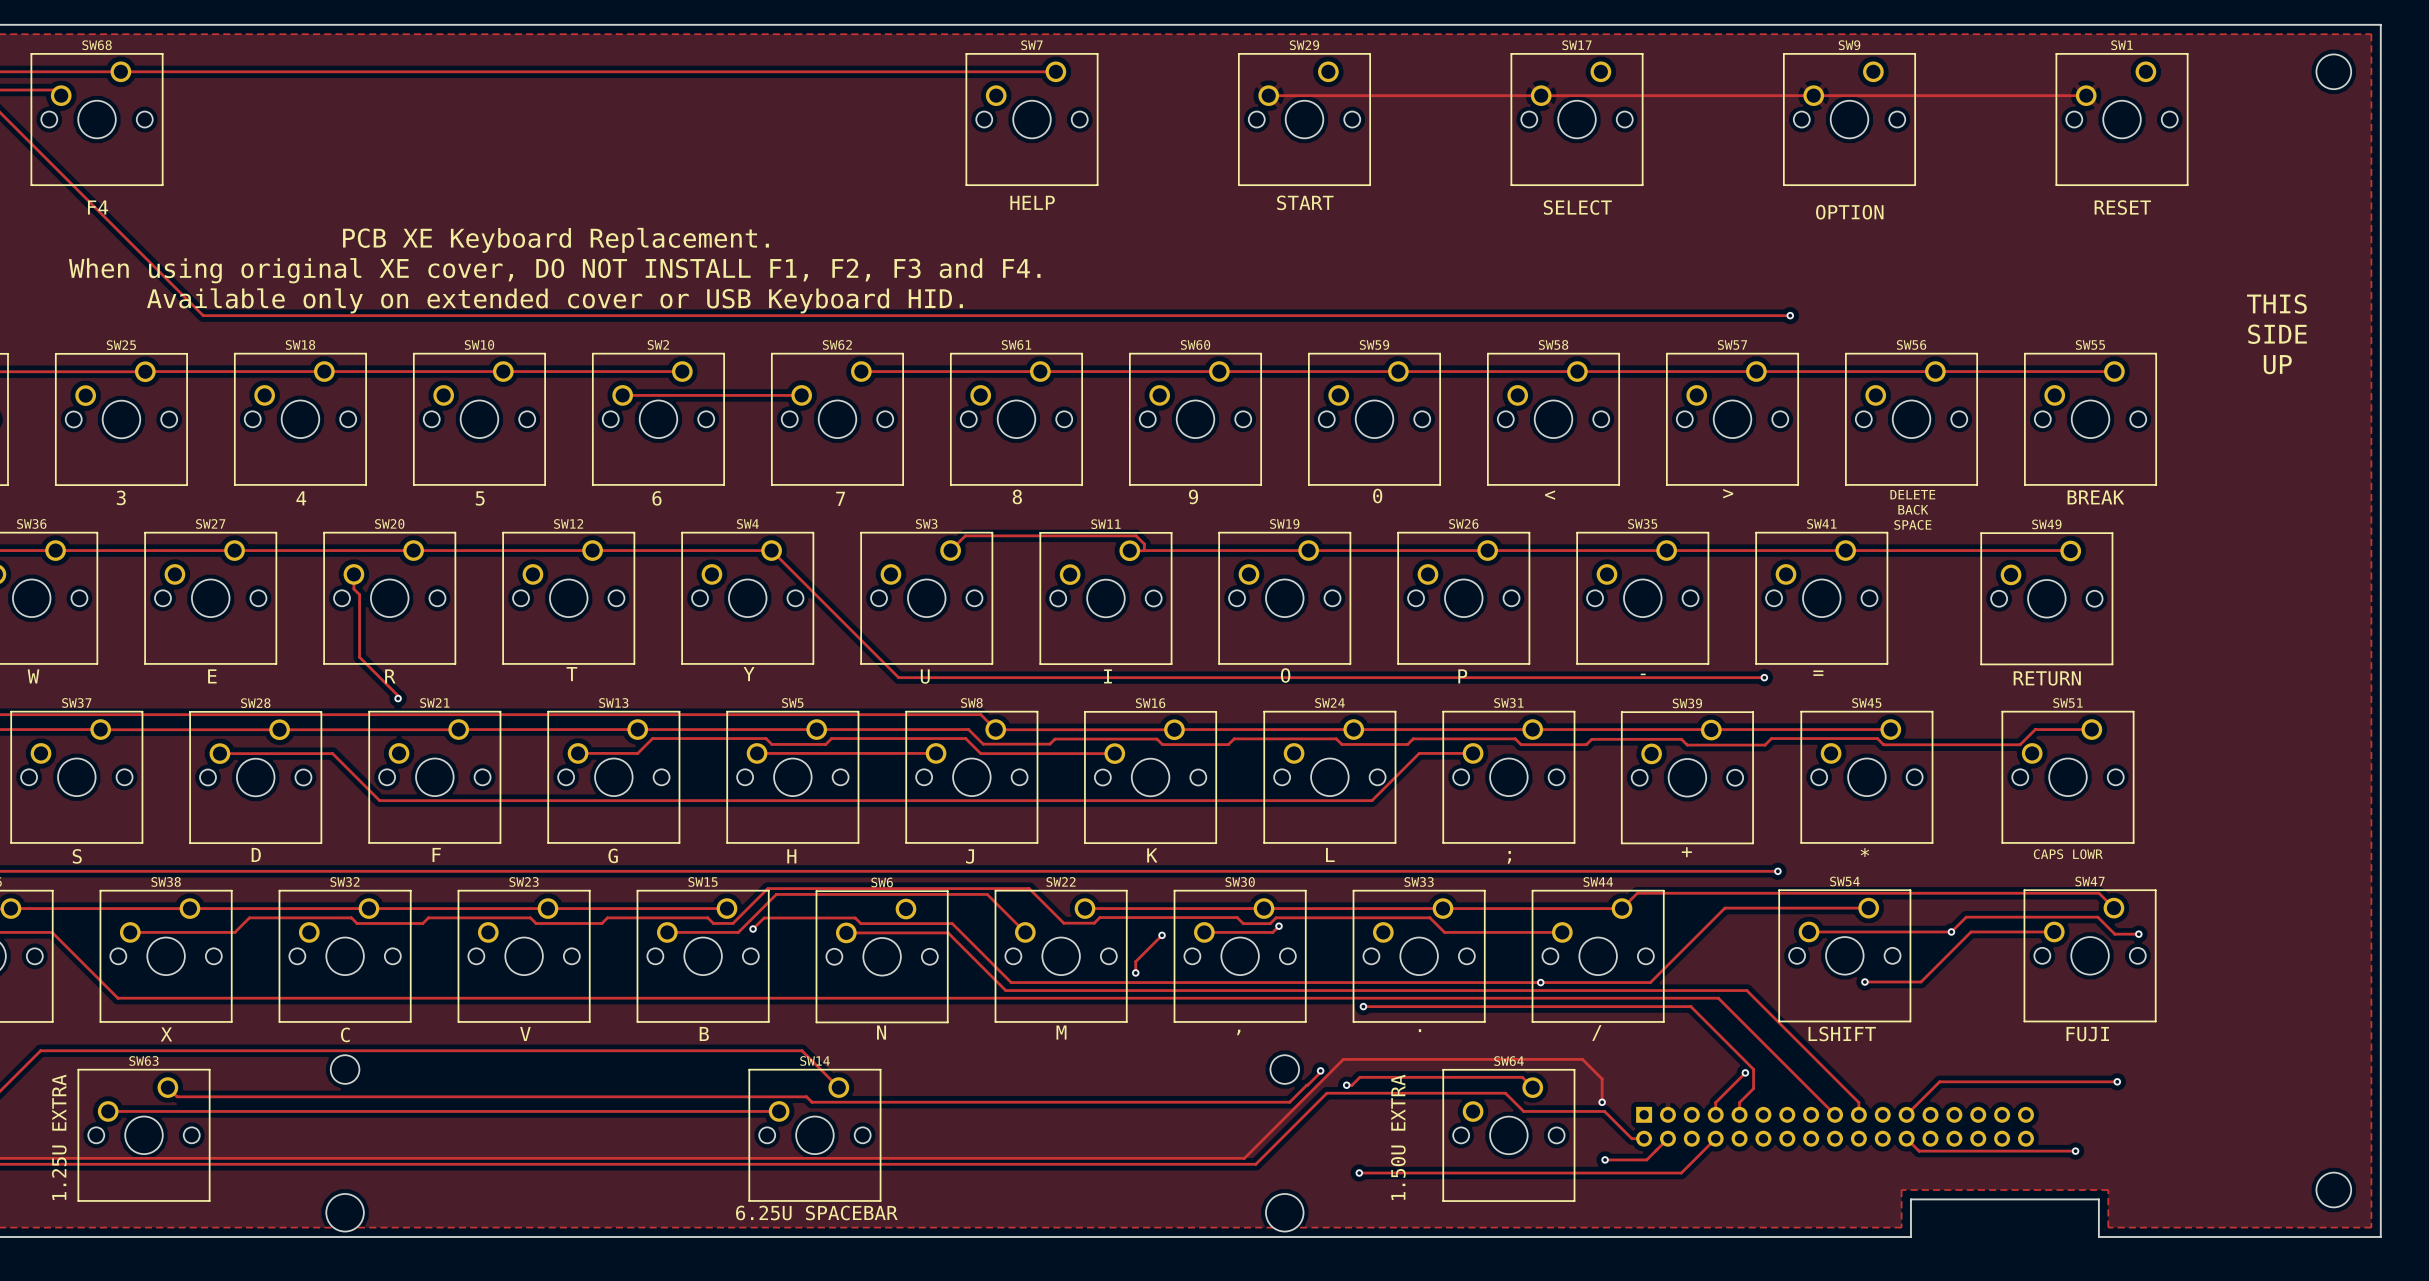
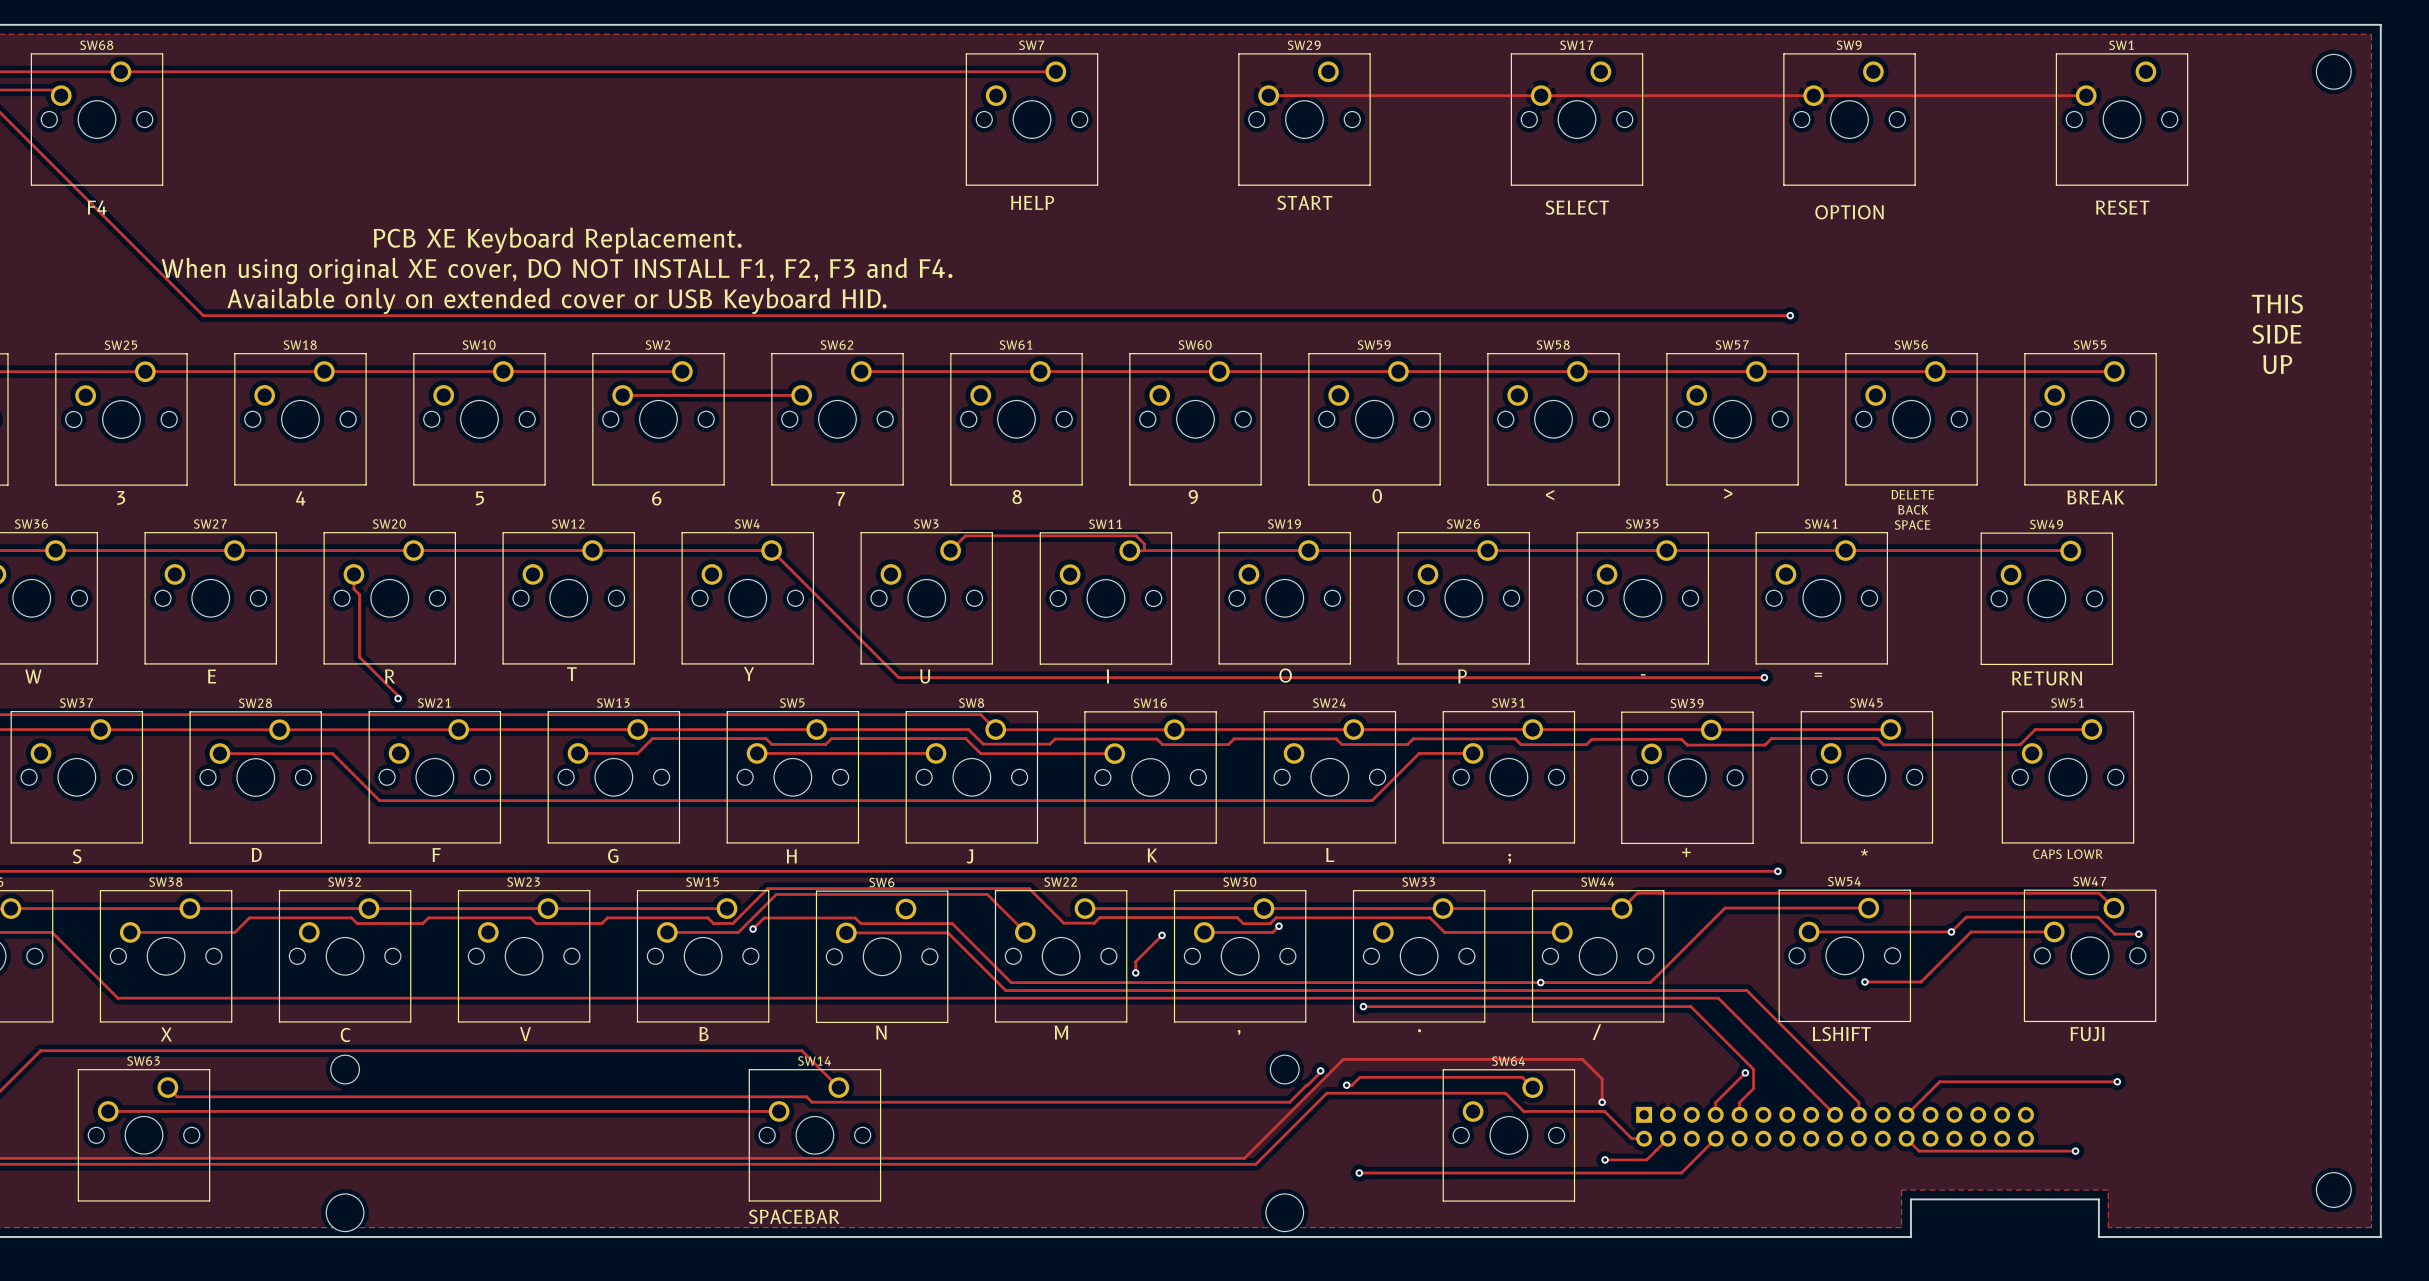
text: 1.25U EXTRA (59, 1137) -> none
text: 1.50U EXTRA (1398, 1137) -> none
text: 6.25U SPACEBAR (816, 1212) -> SPACEBAR (794, 1216)

